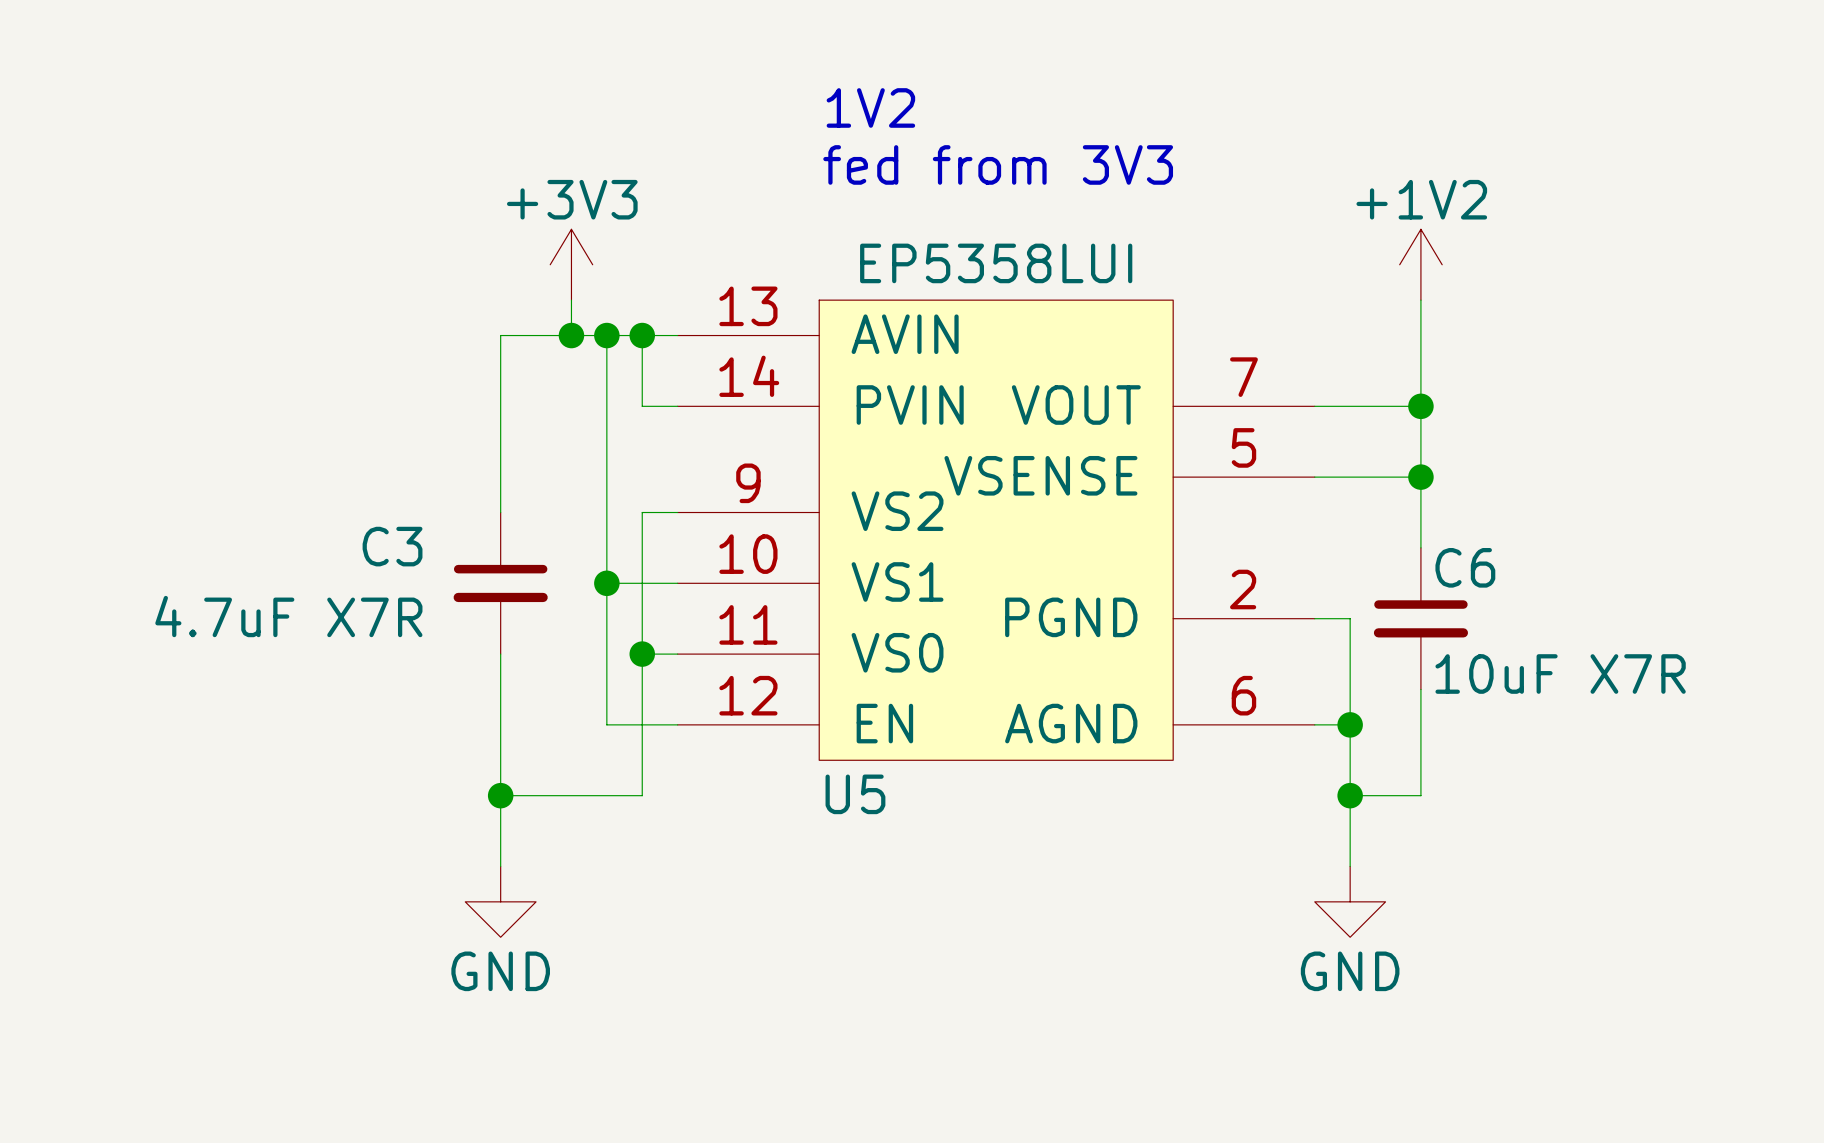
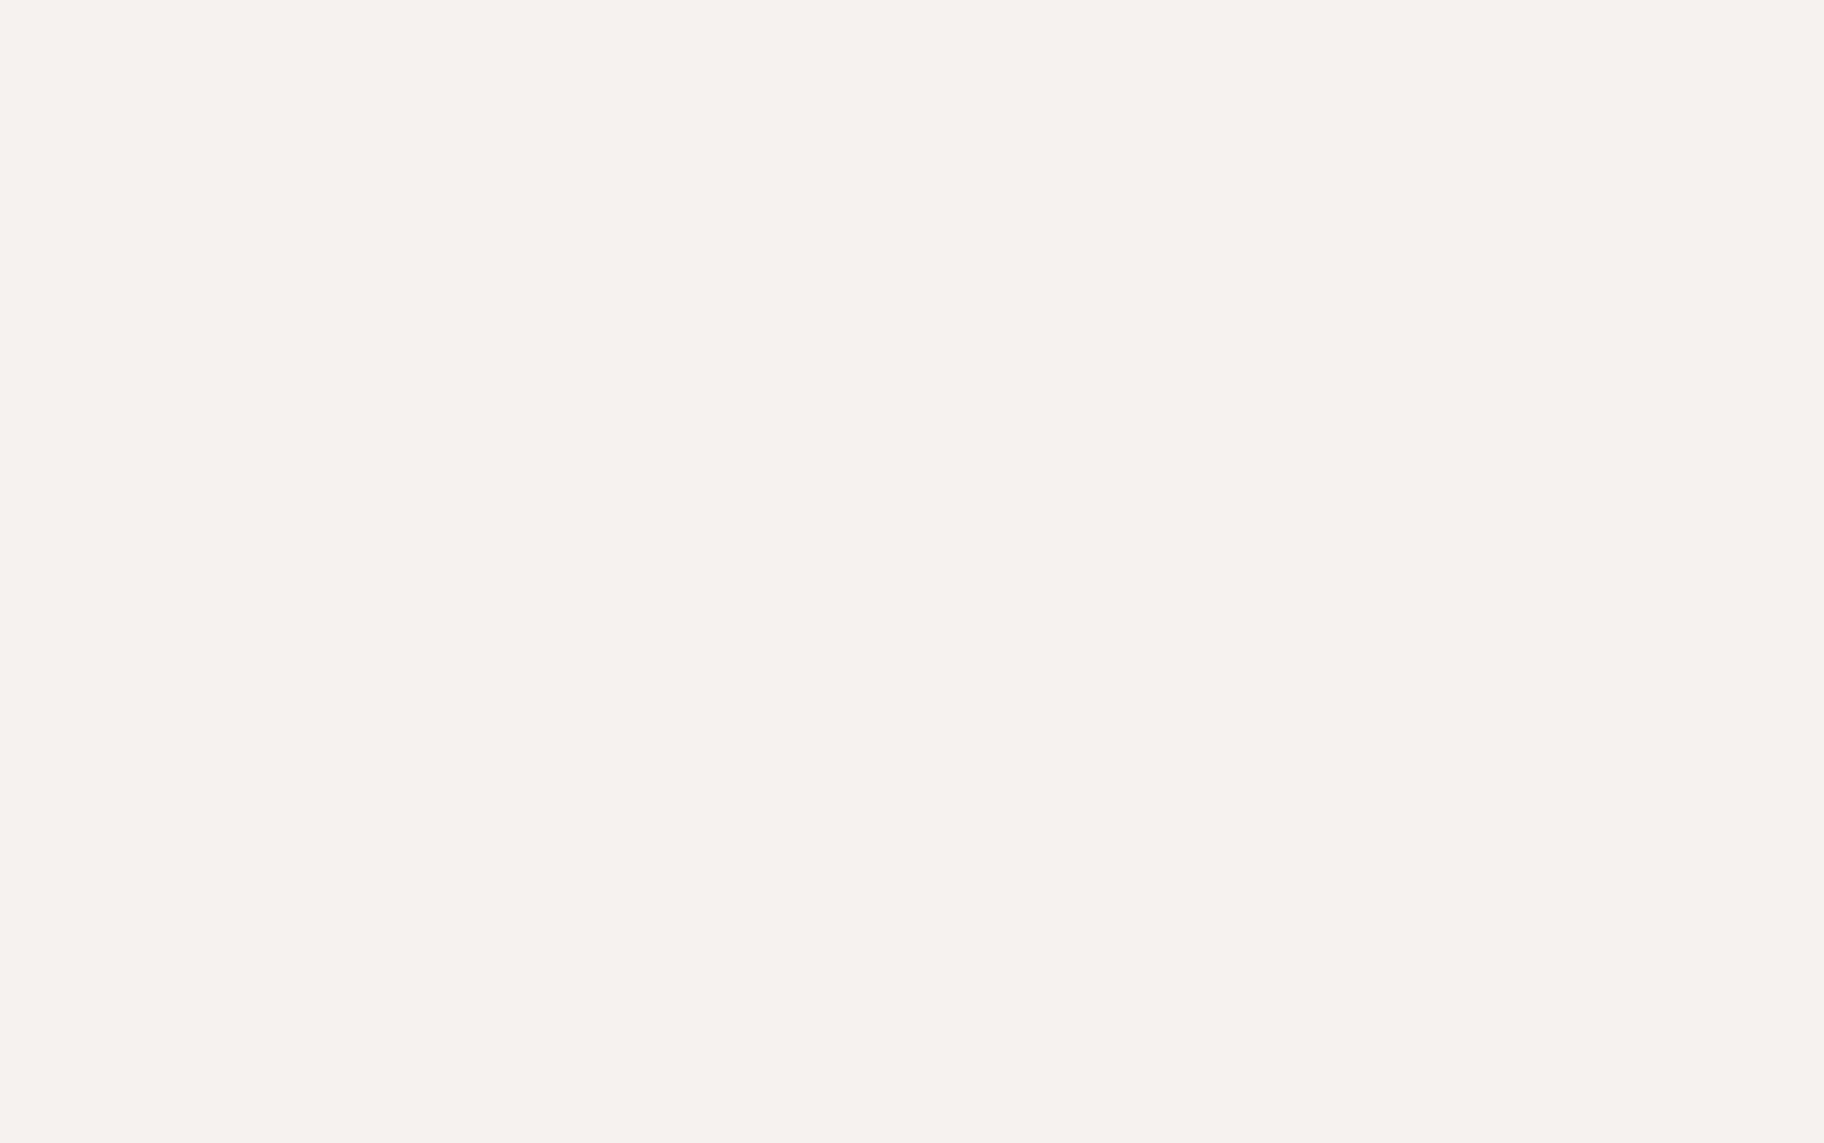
text: 1V2 (870, 107) -> none
text: fed from 3V3 (998, 164) -> none
power symbol: +3V3 (571, 264) -> none
power symbol: +1V2 (1420, 264) -> none
wire: (571, 300) (571, 335) -> none
wire: (1420, 300) (1420, 547) -> none
junction: (571, 335) -> none
wire: (606, 335) (606, 724) (677, 724) -> none
junction: (606, 335) -> none
wire: (642, 335) (642, 406) (677, 406) -> none
junction: (642, 335) -> none
wire: (677, 335) (500, 335) (500, 512) -> none
wire: (1314, 406) (1420, 406) -> none
junction: (1420, 406) -> none
wire: (1314, 477) (1420, 477) -> none
junction: (1420, 477) -> none
wire: (677, 512) (642, 512) (642, 795) (500, 795) -> none
U5: EP5358LUI (996, 530) -> none
C3: 4.7uF X7R (500, 583) -> none
wire: (606, 583) (677, 583) -> none
junction: (606, 583) -> none
wire: (1314, 618) (1350, 618) (1350, 866) -> none
C6: 10uF X7R (1420, 618) -> none
wire: (500, 654) (500, 866) -> none
wire: (642, 654) (677, 654) -> none
junction: (642, 654) -> none
wire: (1420, 689) (1420, 795) (1350, 795) -> none
wire: (1314, 724) (1350, 724) -> none
junction: (1350, 724) -> none
junction: (500, 795) -> none
junction: (1350, 795) -> none
power symbol: GND (500, 901) -> none
power symbol: GND (1350, 901) -> none

